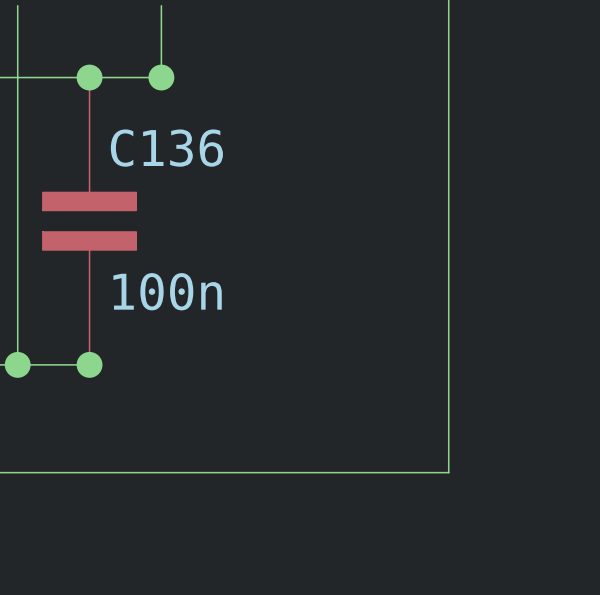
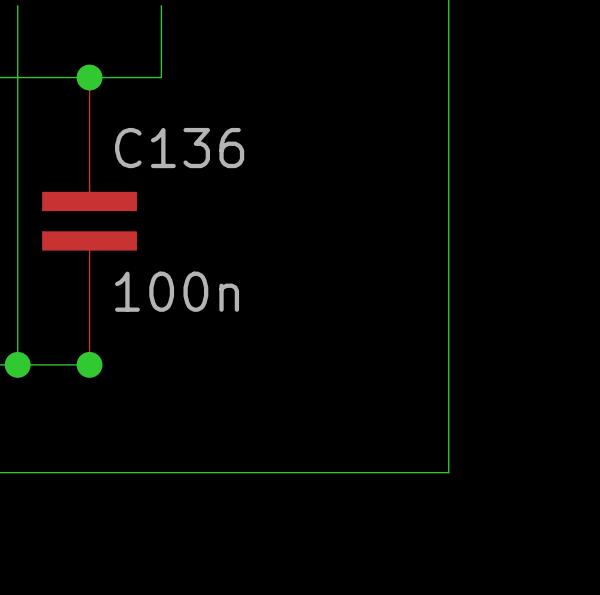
junction: (161, 77) -> none

